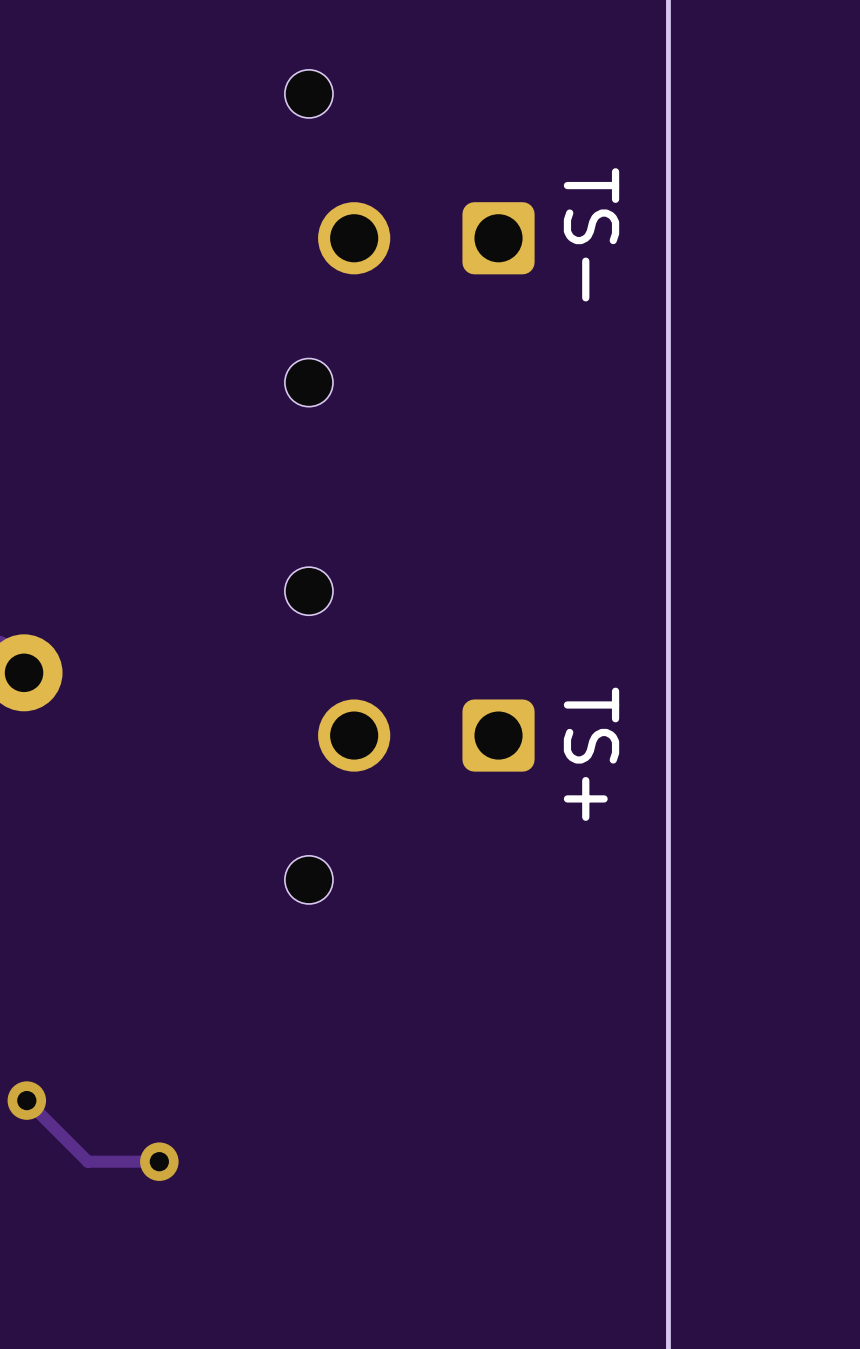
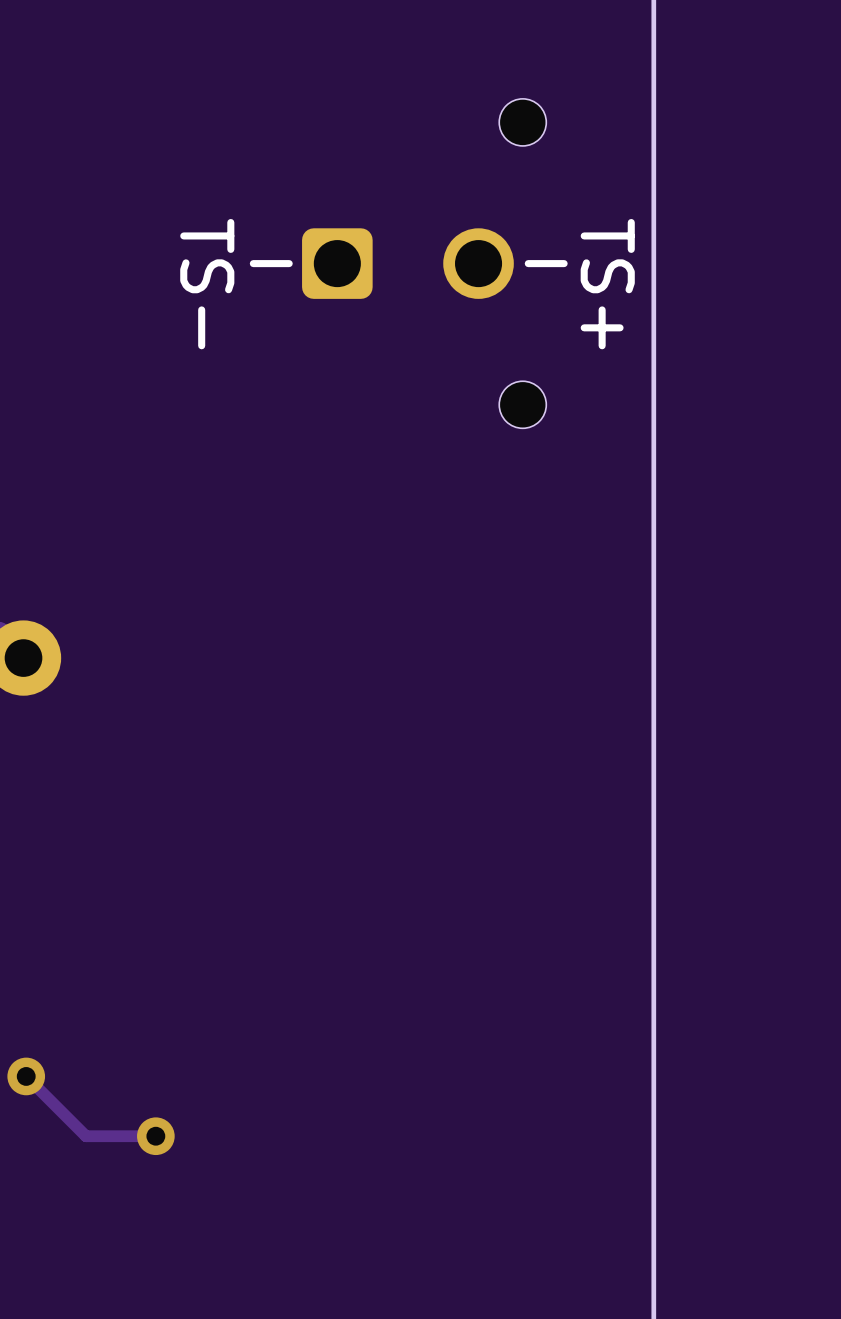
text position: TS- (591, 234) -> TS- (207, 284)
part rotation: 0° (409, 238) -> 180° (424, 263)
line: none -> (289, 263) (253, 263)
line: none -> (564, 263) (528, 263)
part: (409, 735) -> none
text position: TS+ (591, 754) -> TS+ (607, 284)

